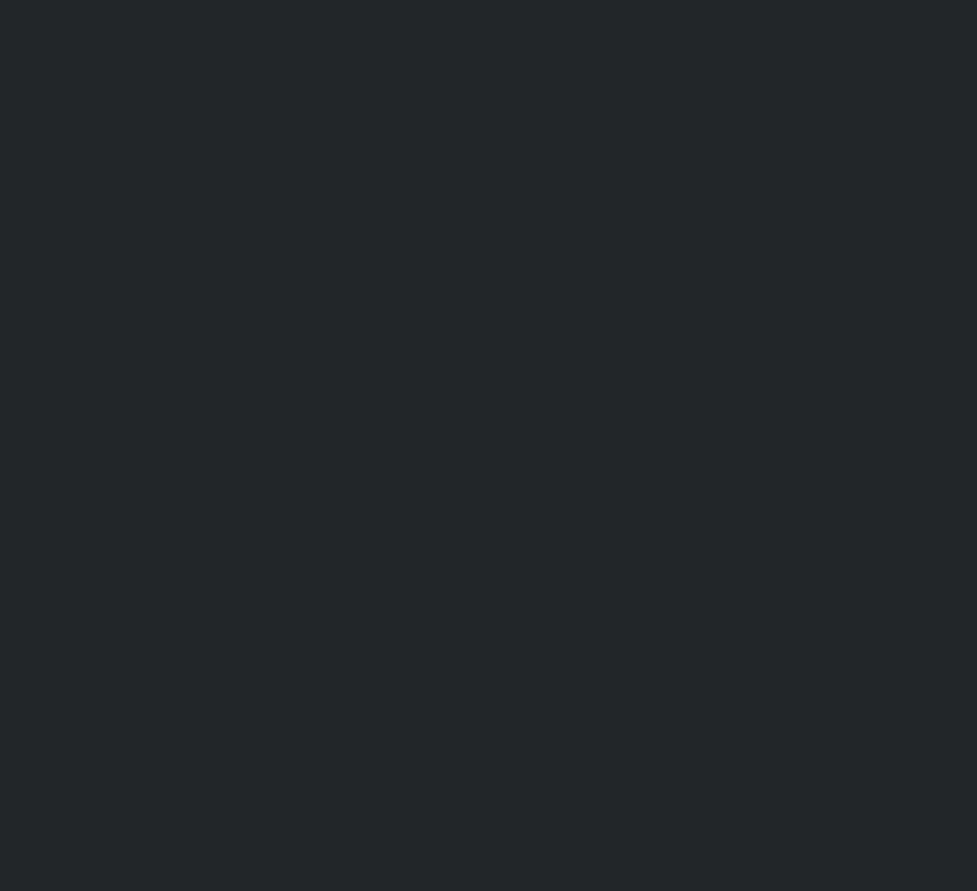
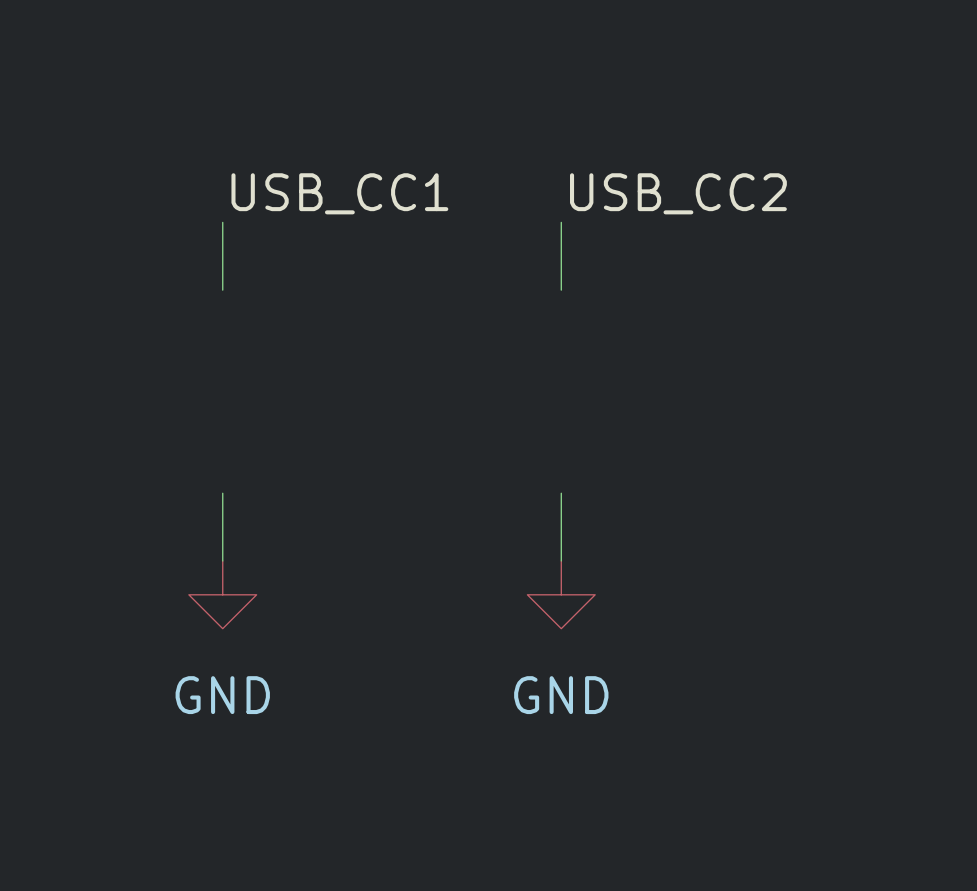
label: none -> USB_CC1 (339, 193)
label: none -> USB_CC2 (678, 193)
wire: none -> (222, 222) (222, 290)
wire: none -> (561, 222) (561, 290)
wire: none -> (222, 493) (222, 560)
wire: none -> (561, 493) (561, 560)
power symbol: none -> GND (222, 594)
power symbol: none -> GND (561, 594)

